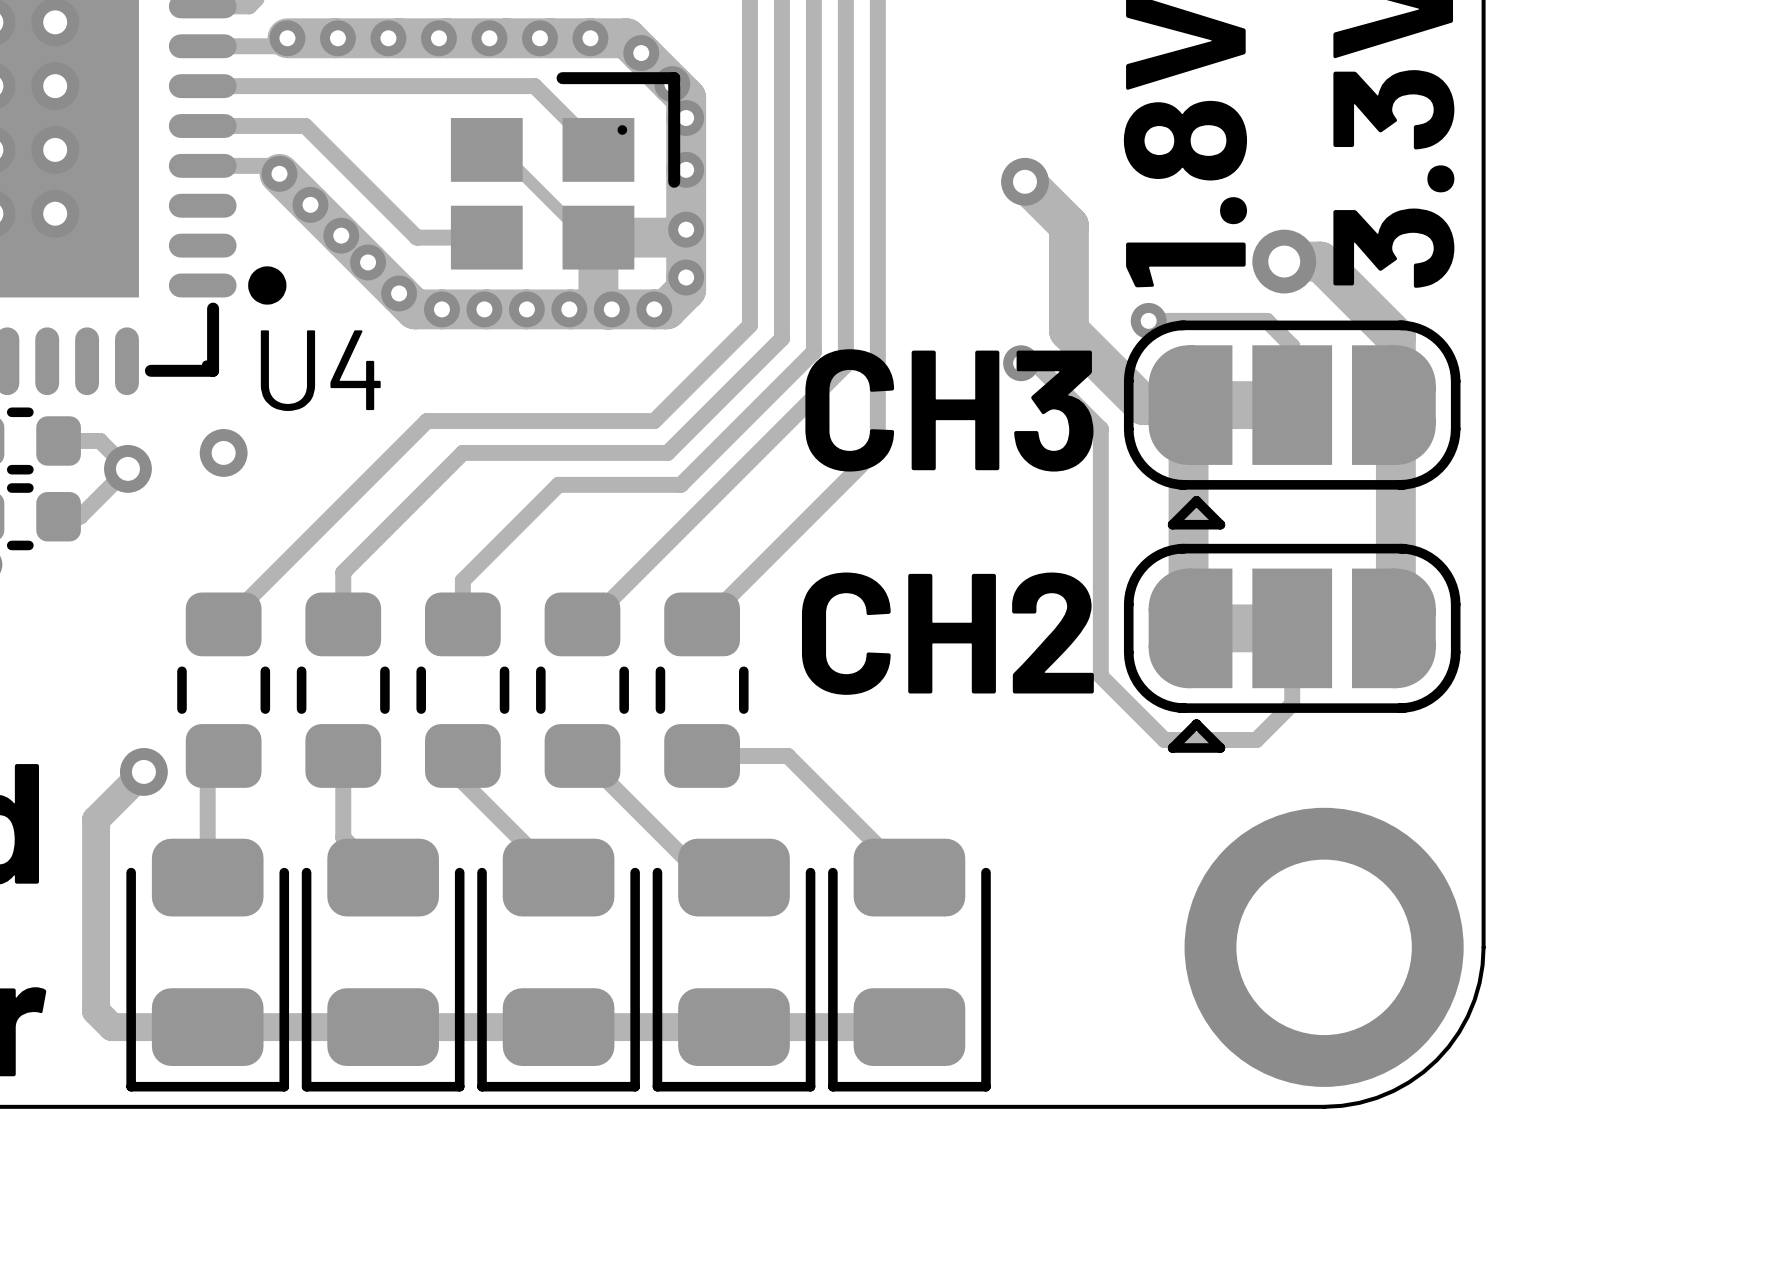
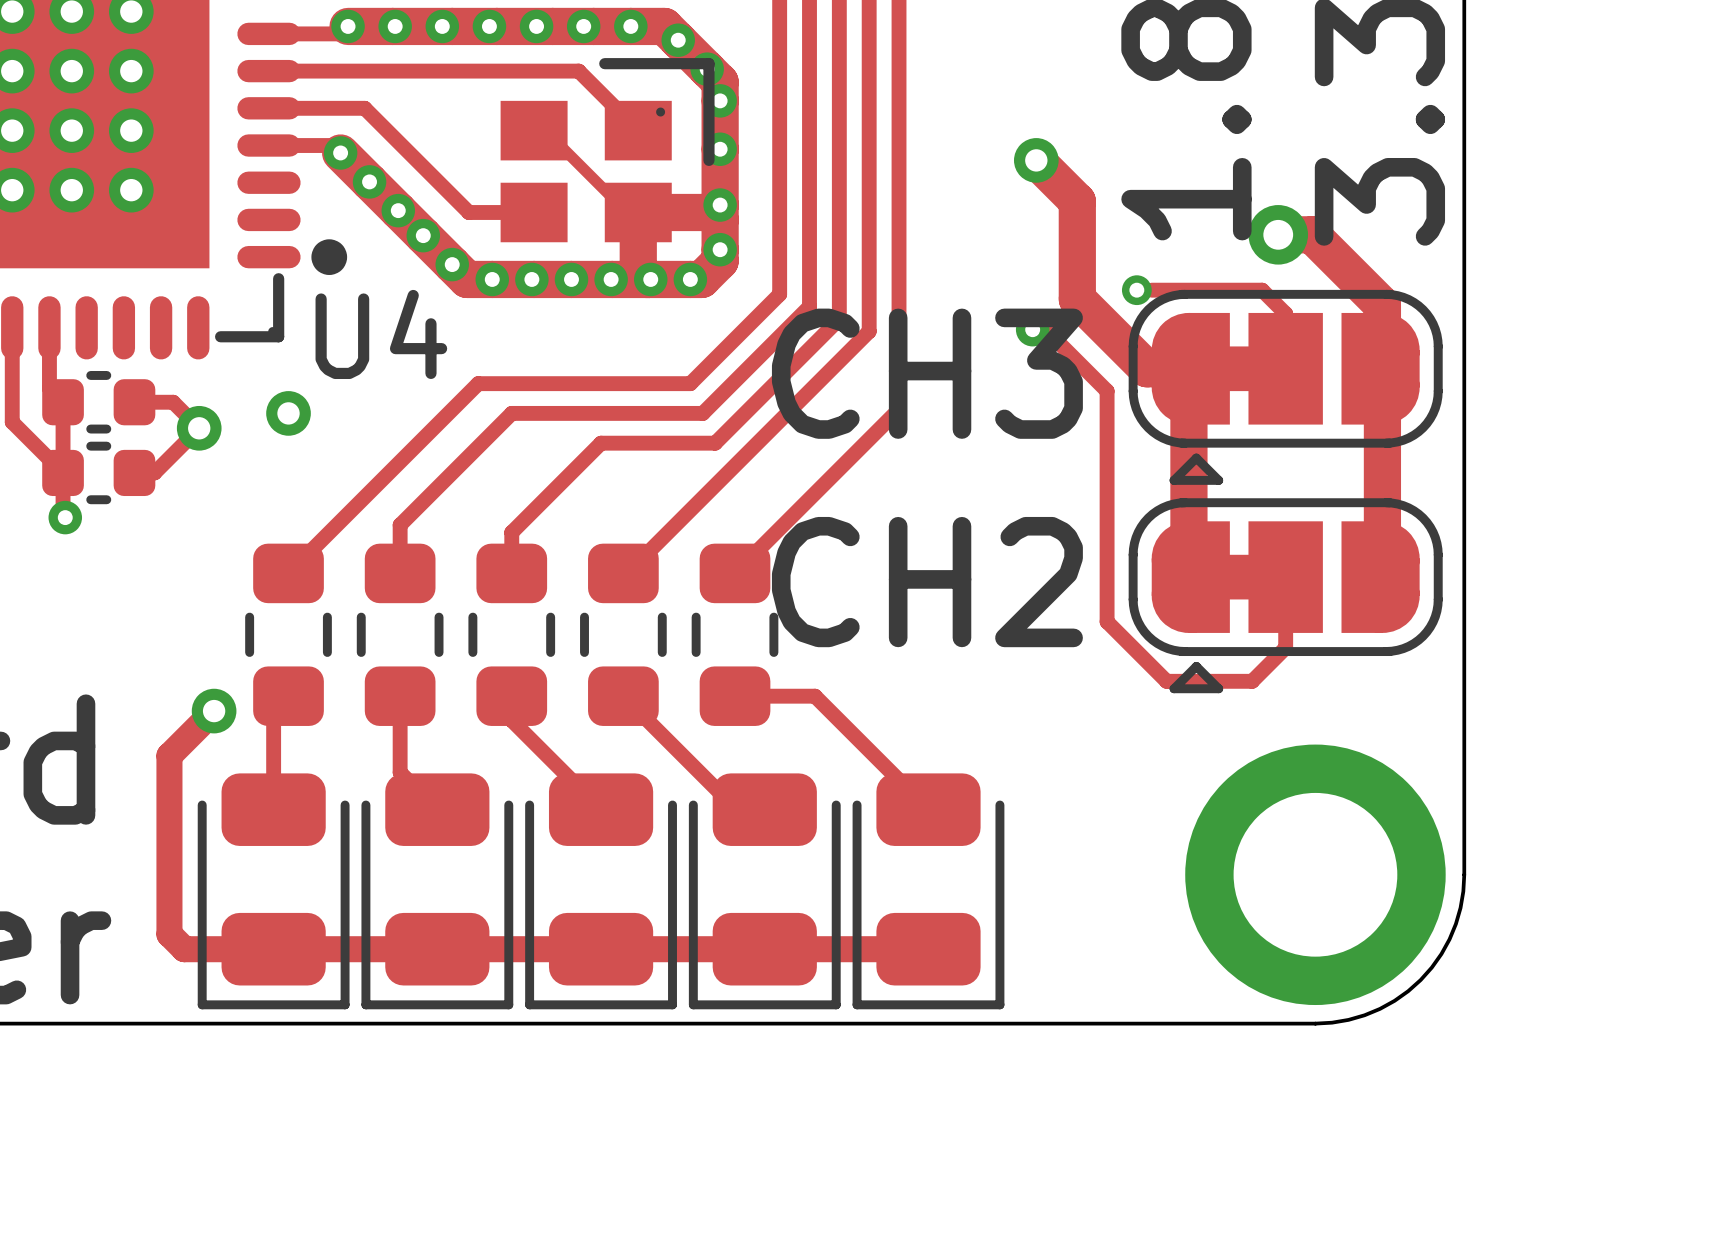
via position: (1148, 320) -> (1136, 290)

